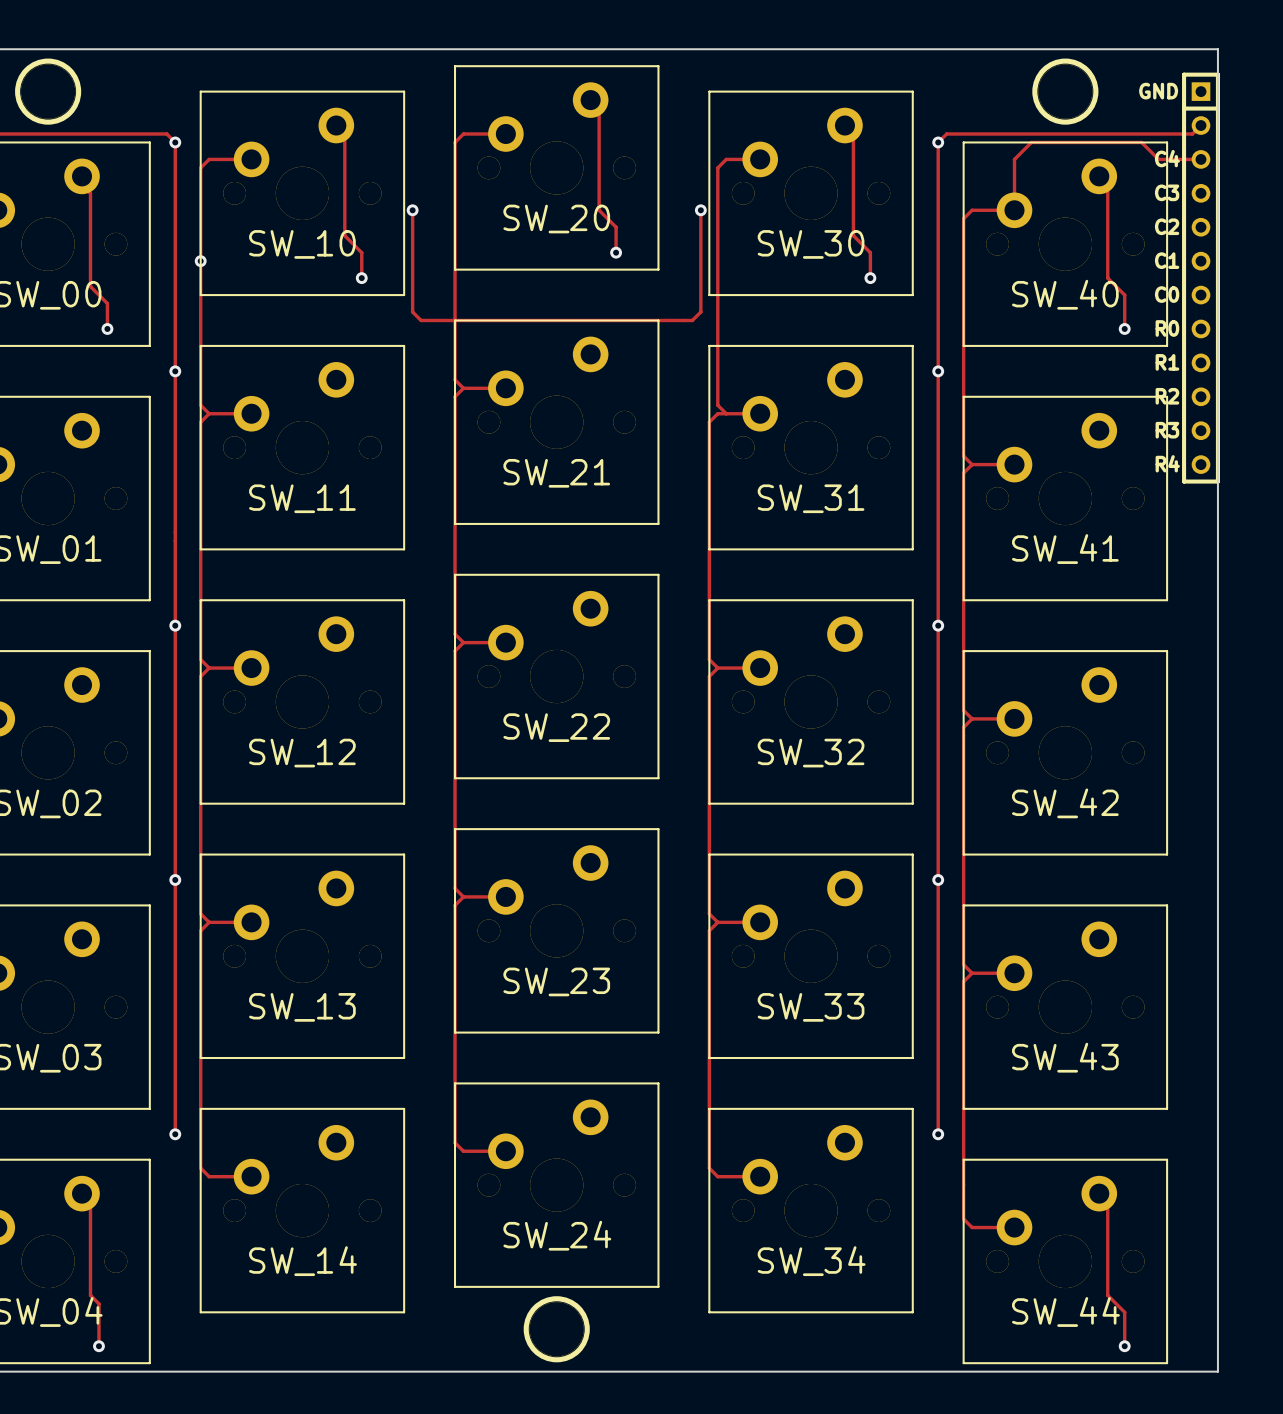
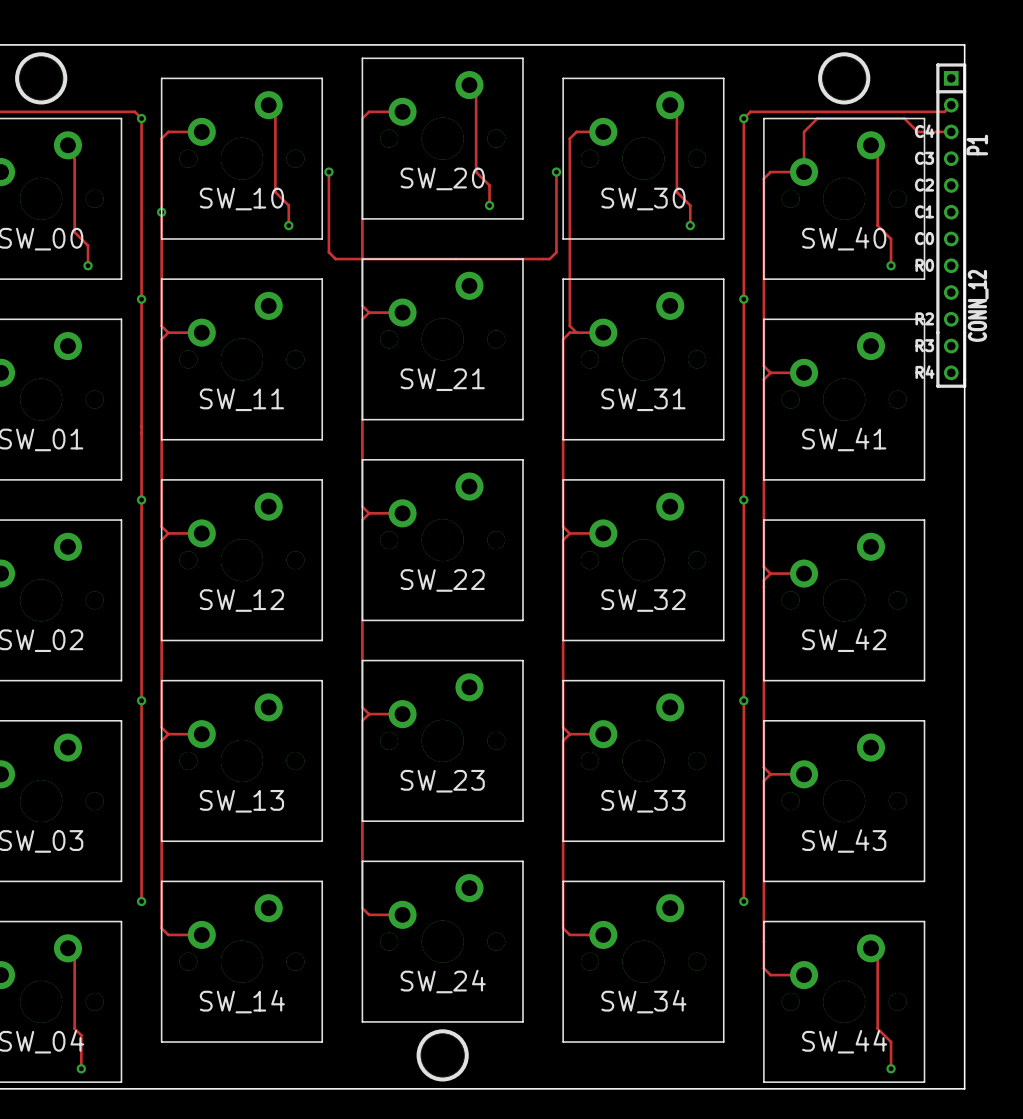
text: GND (1158, 91) -> none
P1 name: none -> P1 (977, 145)
text: R1 (1167, 362) -> none
P1 value: none -> CONN_12 (978, 305)

